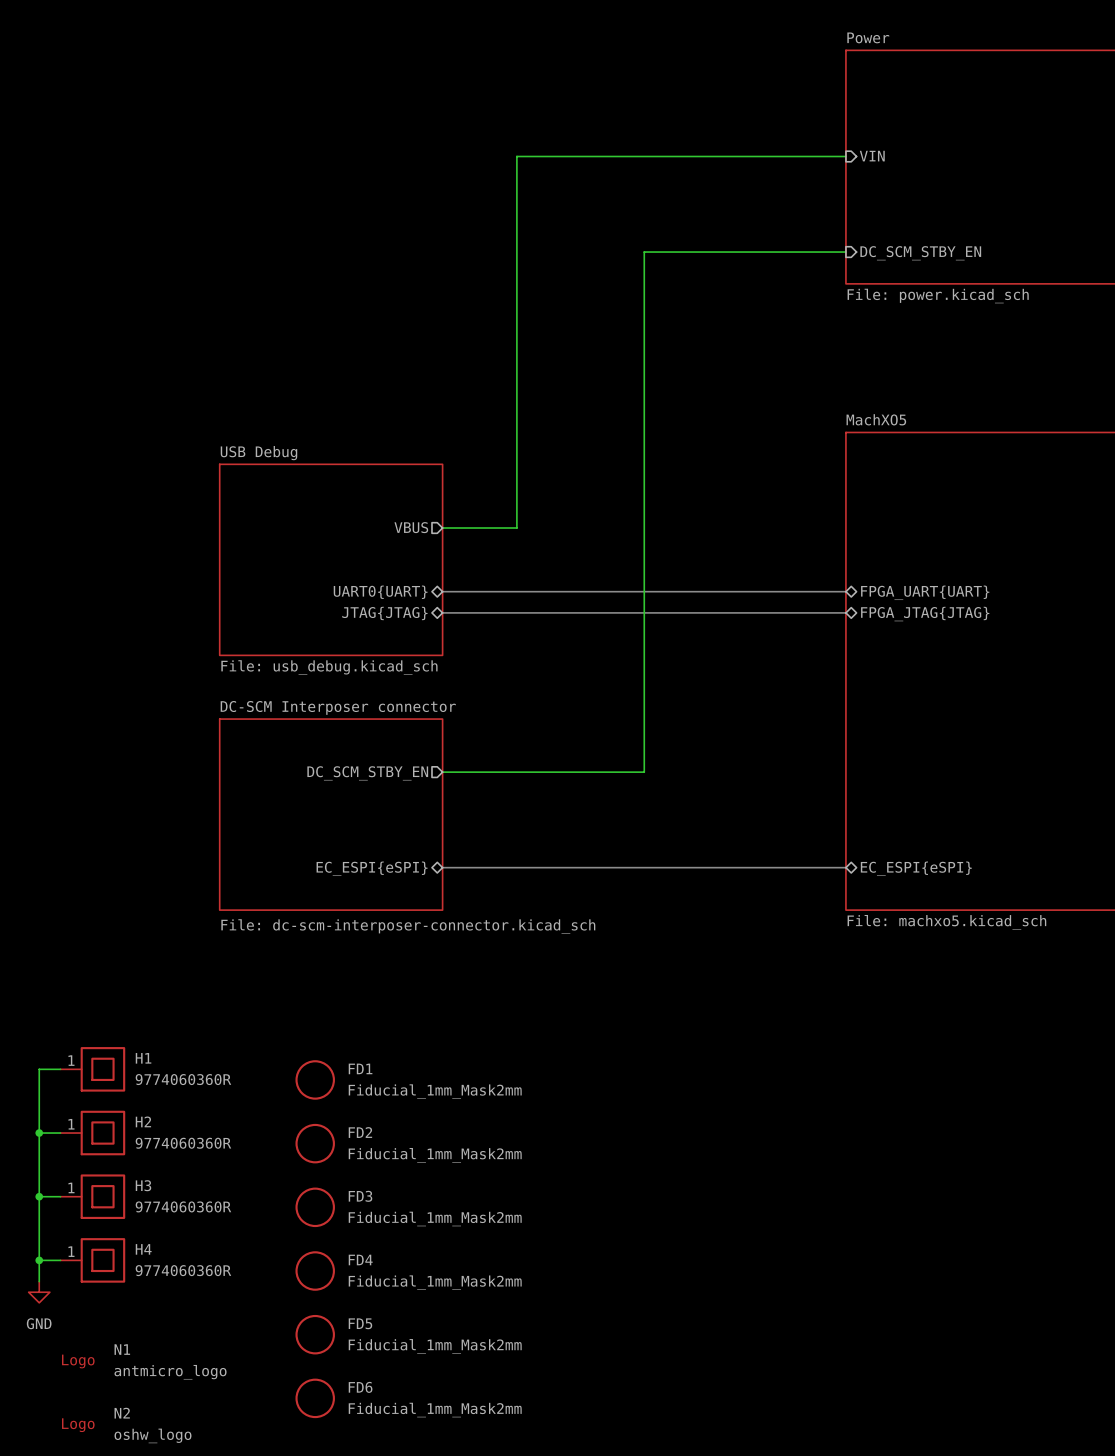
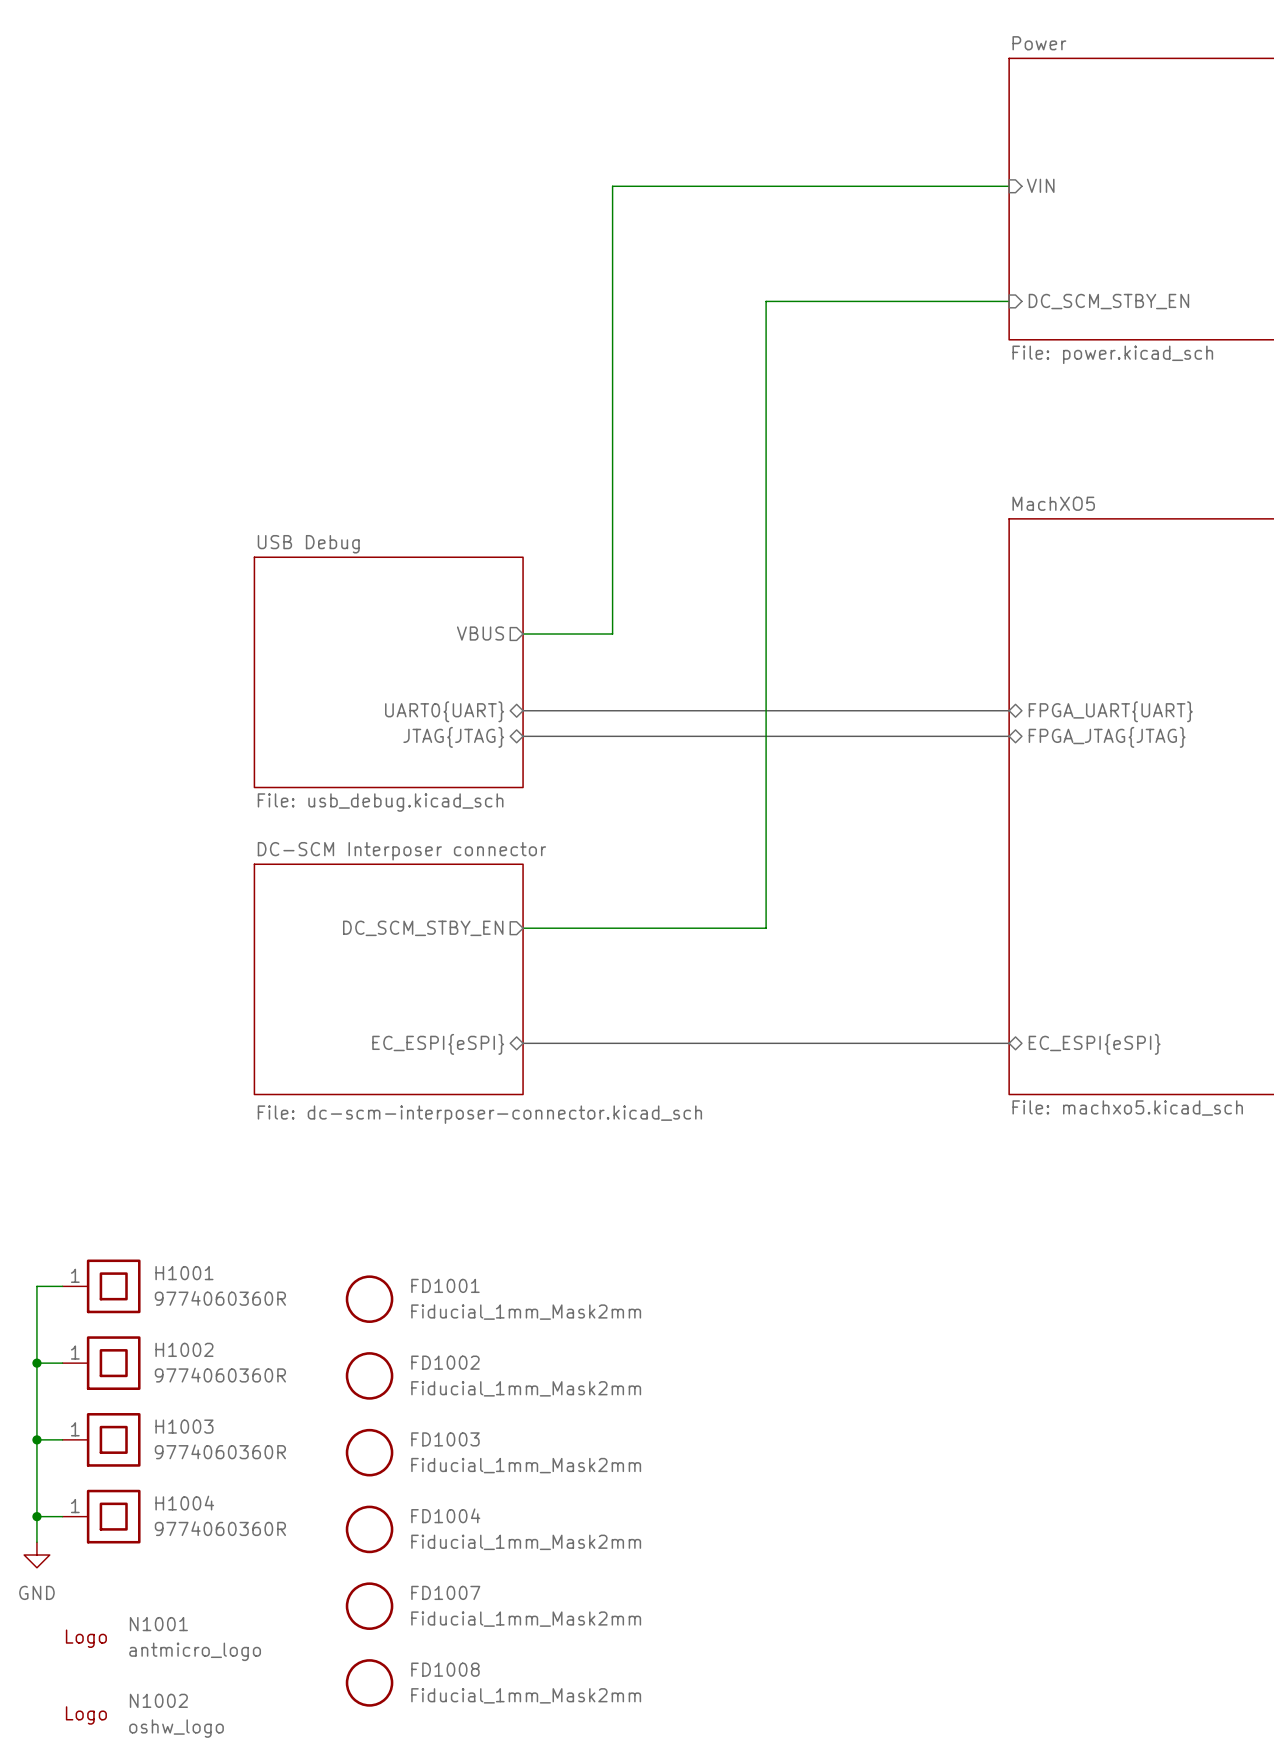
H1 name: H1 (143, 1058) -> H1001 (184, 1273)
FD1 name: FD1 (360, 1068) -> FD1001 (445, 1285)
H2 name: H2 (143, 1121) -> H1002 (184, 1349)
FD2 name: FD2 (360, 1132) -> FD1002 (445, 1362)
H3 name: H3 (143, 1185) -> H1003 (184, 1426)
FD3 name: FD3 (360, 1196) -> FD1003 (445, 1439)
H4 name: H4 (143, 1249) -> H1004 (184, 1503)
FD4 name: FD4 (360, 1259) -> FD1004 (445, 1515)
FD5 name: FD5 (360, 1323) -> FD1007 (445, 1592)
N1 name: N1 (122, 1349) -> N1001 (158, 1624)
FD6 name: FD6 (360, 1387) -> FD1008 (445, 1669)
N2 name: N2 (122, 1413) -> N1002 (158, 1700)

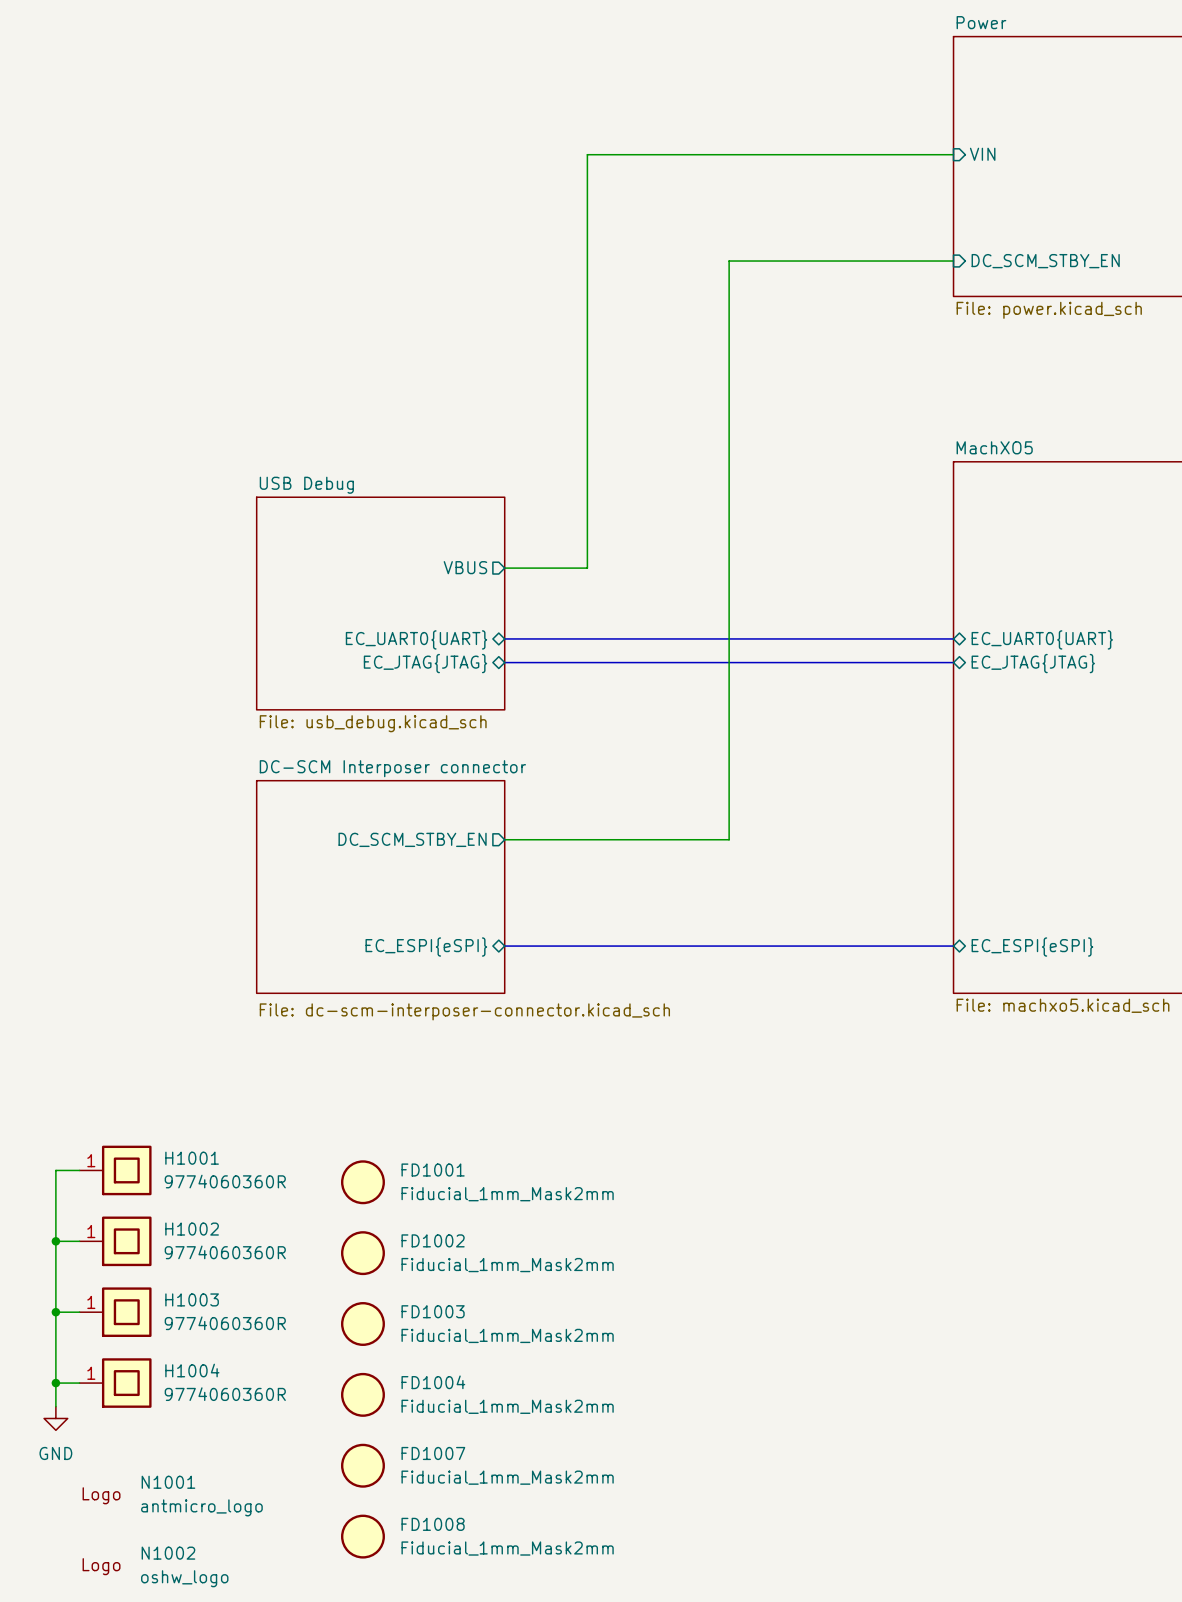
sheet pin: UART0{UART} (444, 711) -> EC_UART0{UART} (416, 639)
sheet pin: FPGA_UART{UART} (1110, 711) -> EC_UART0{UART} (1042, 639)
sheet pin: JTAG{JTAG} (453, 737) -> EC_JTAG{JTAG} (425, 663)
sheet pin: FPGA_JTAG{JTAG} (1107, 737) -> EC_JTAG{JTAG} (1033, 663)

